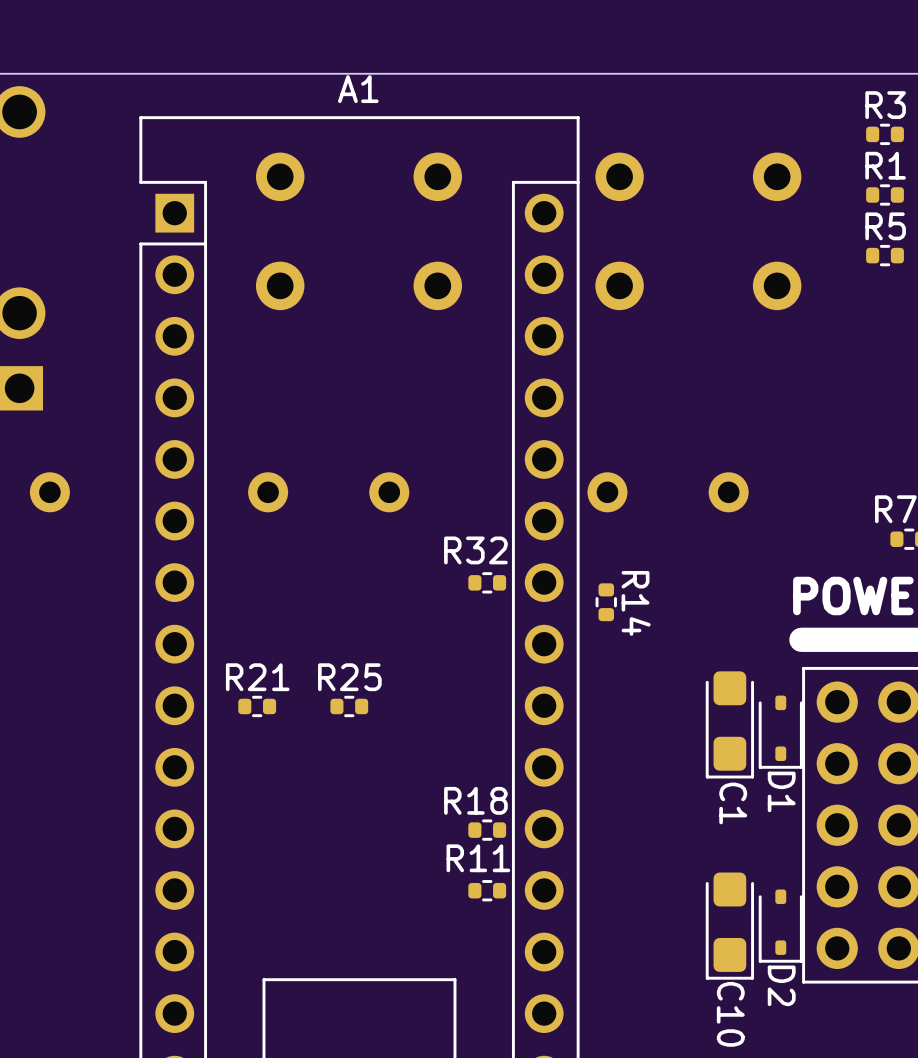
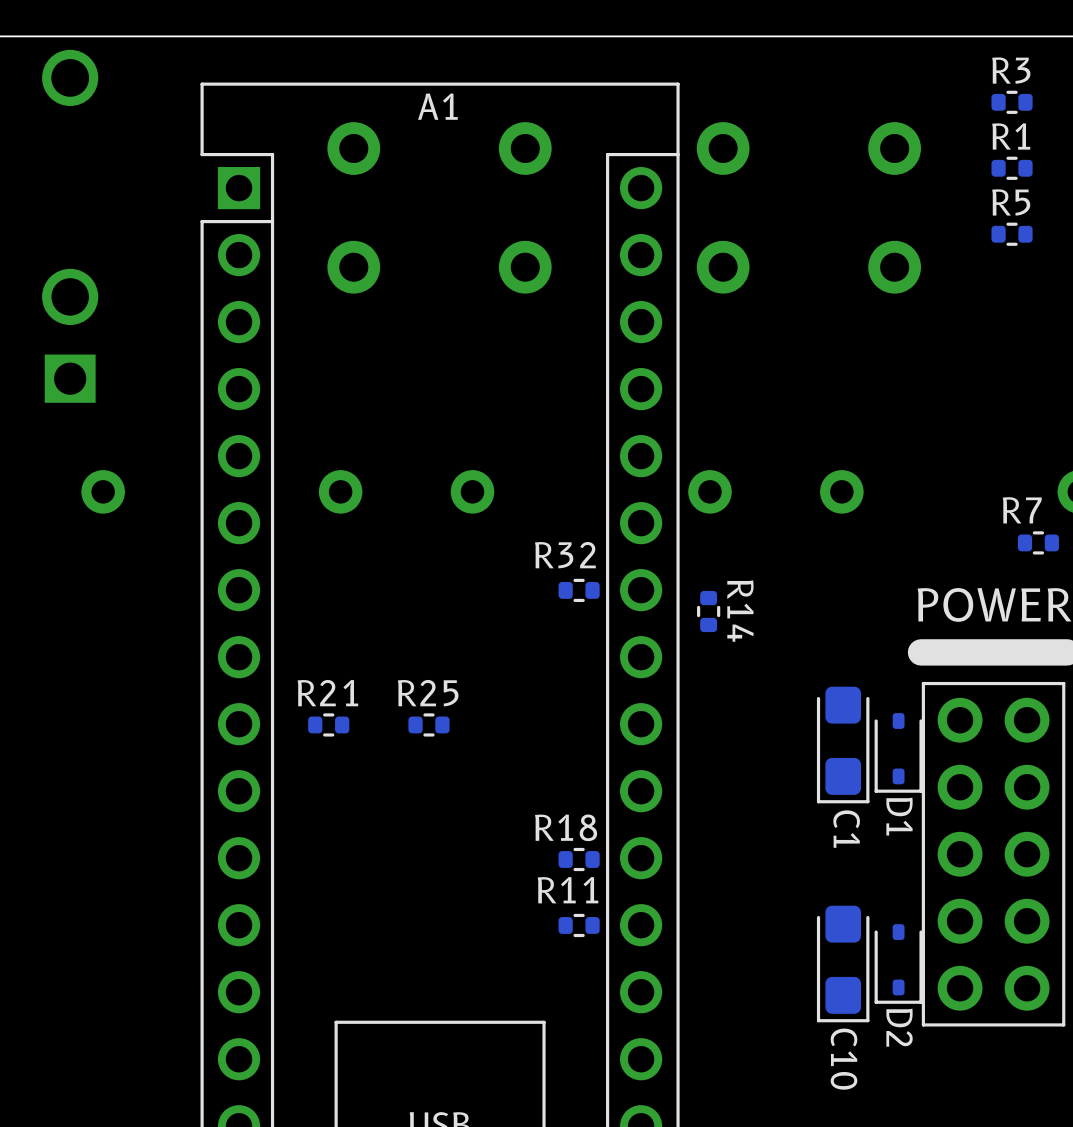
A1 name position: A1 (358, 89) -> A1 (437, 106)

